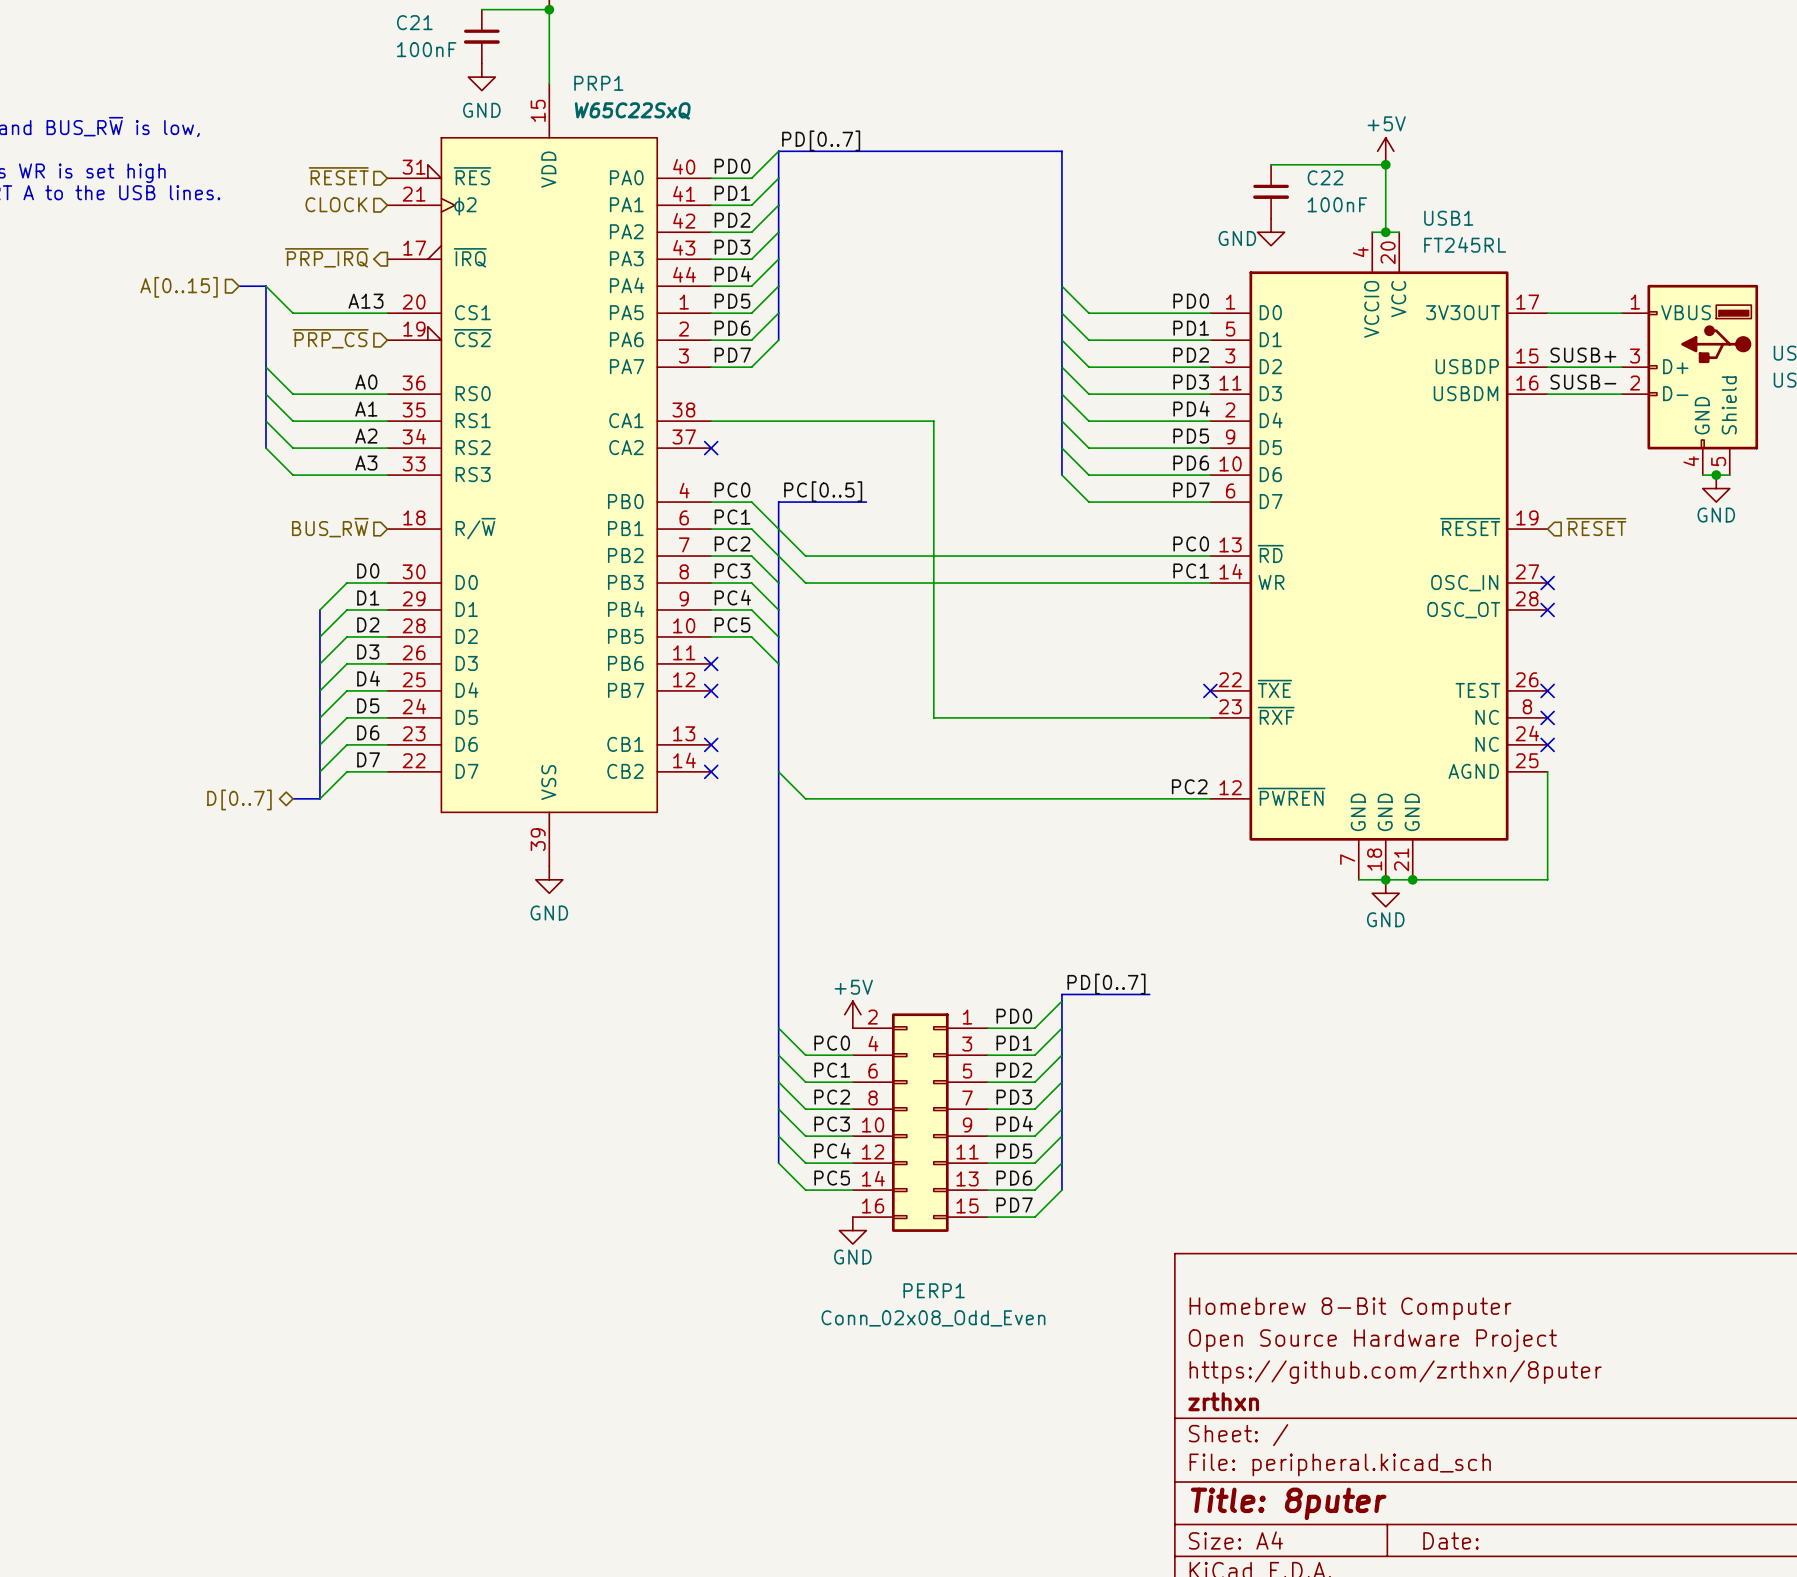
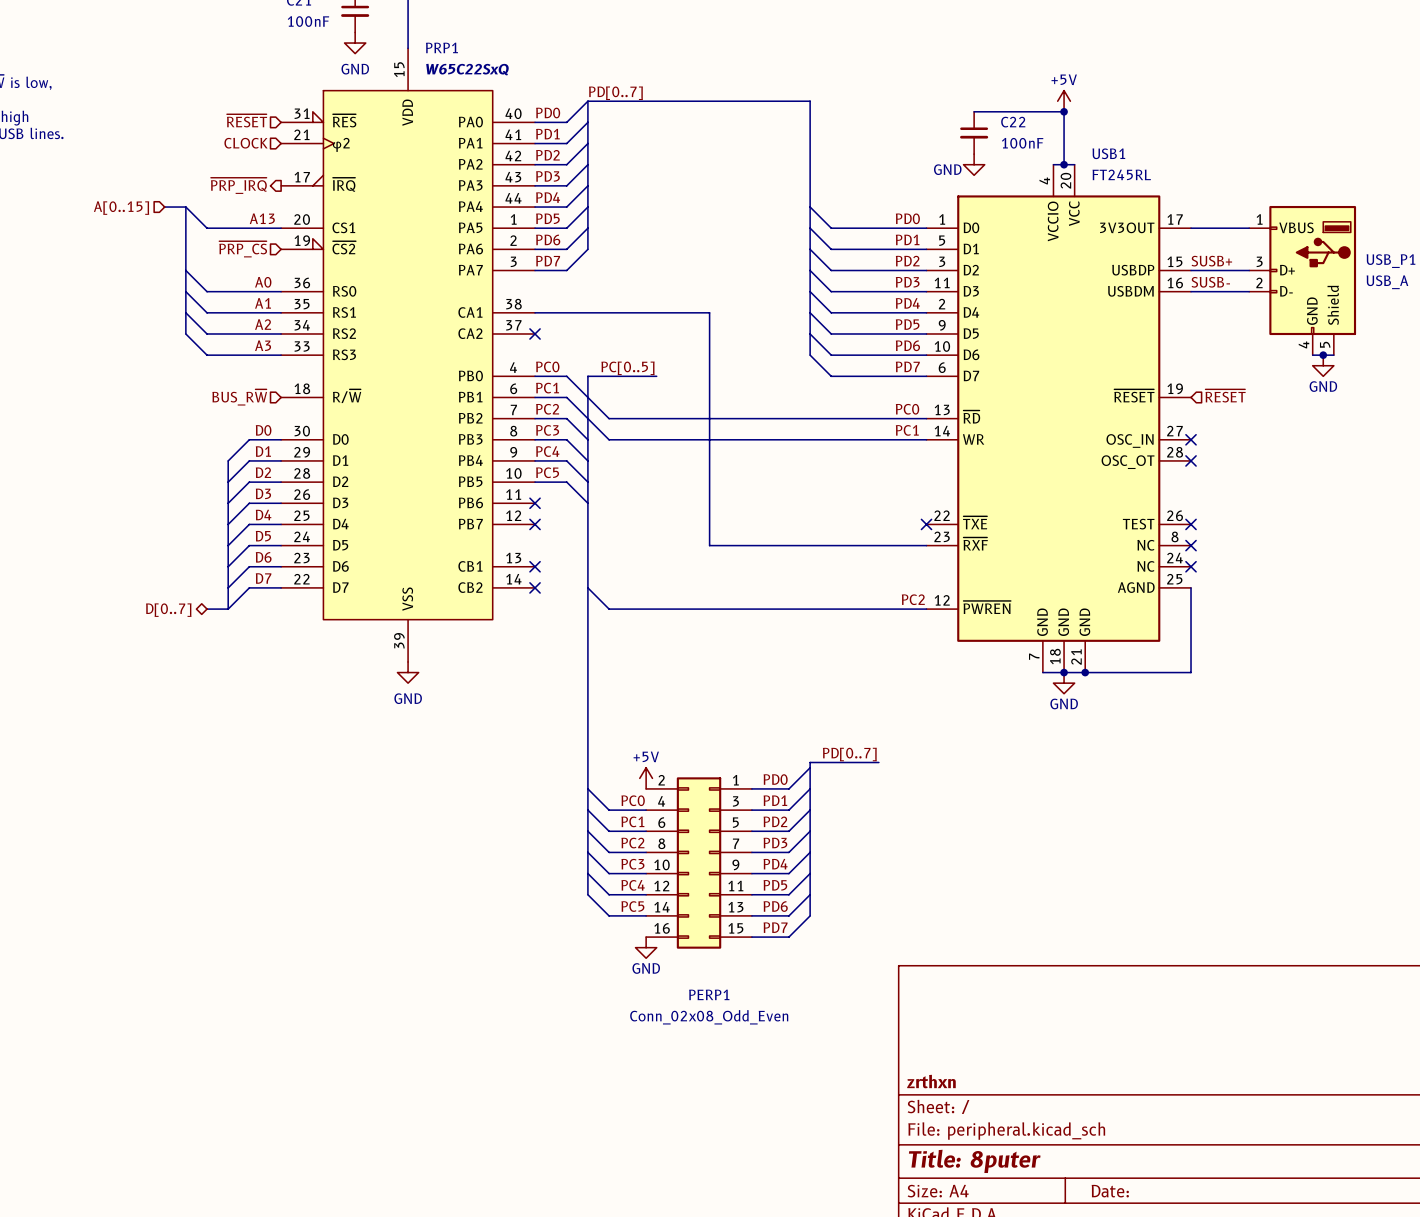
title block: Homebrew 8-Bit Computer (1350, 1308) -> none
title block: Open Source Hardware Project (1372, 1340) -> none
title block: https://github.com/zrthxn/8puter (1395, 1372) -> none

